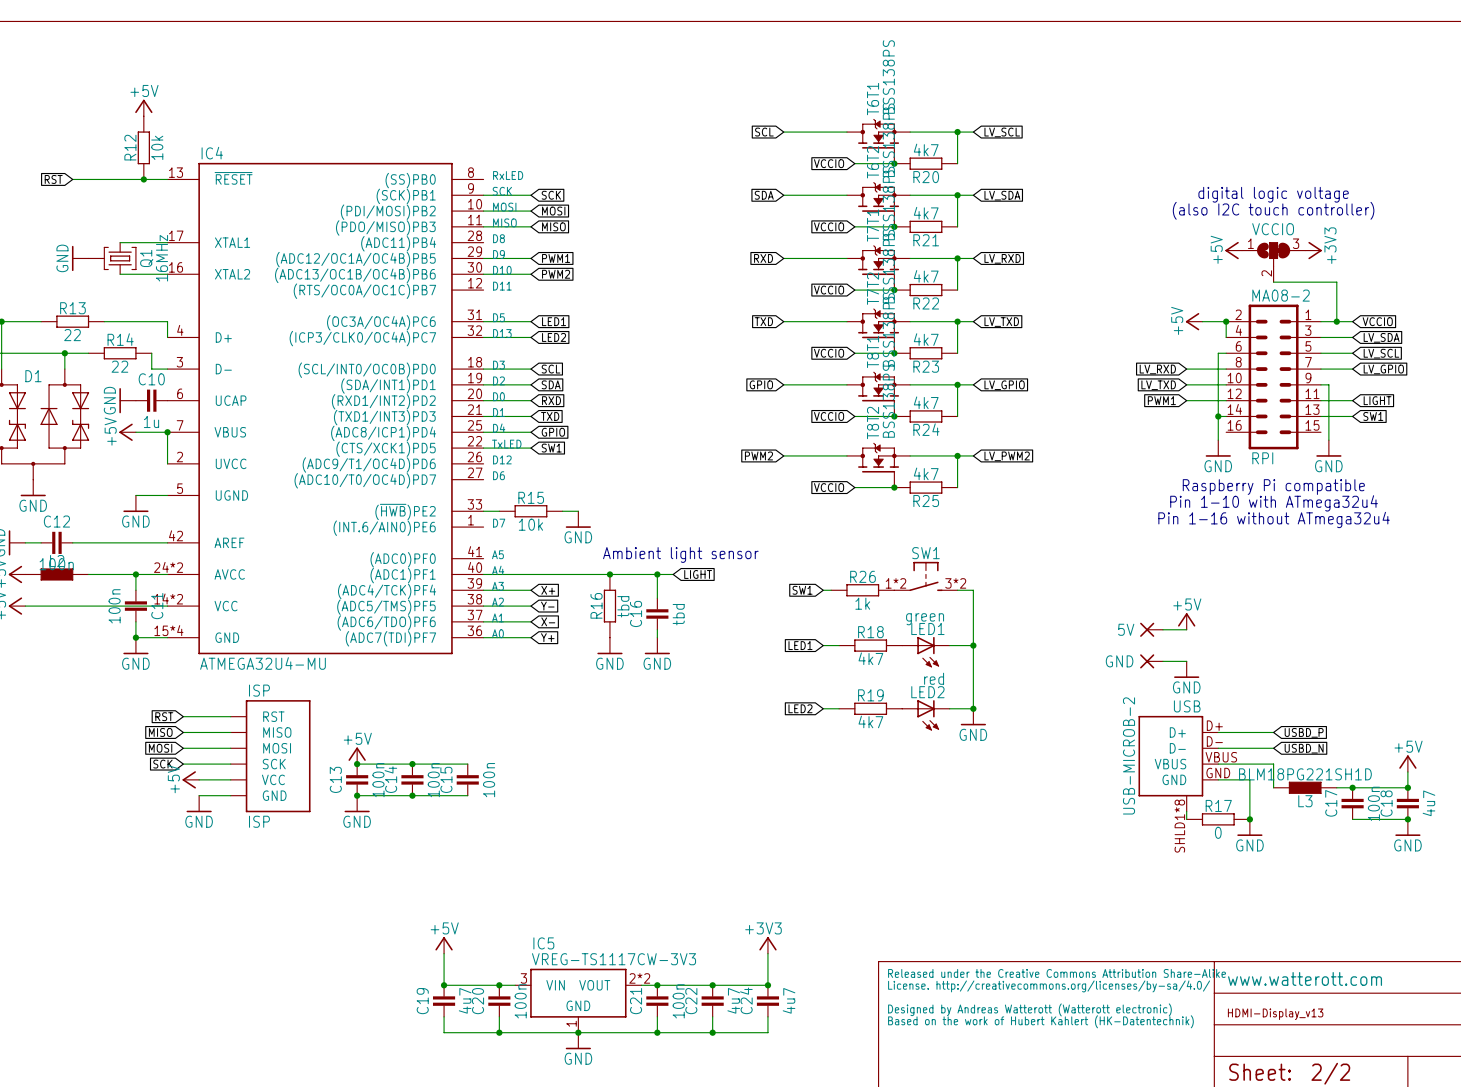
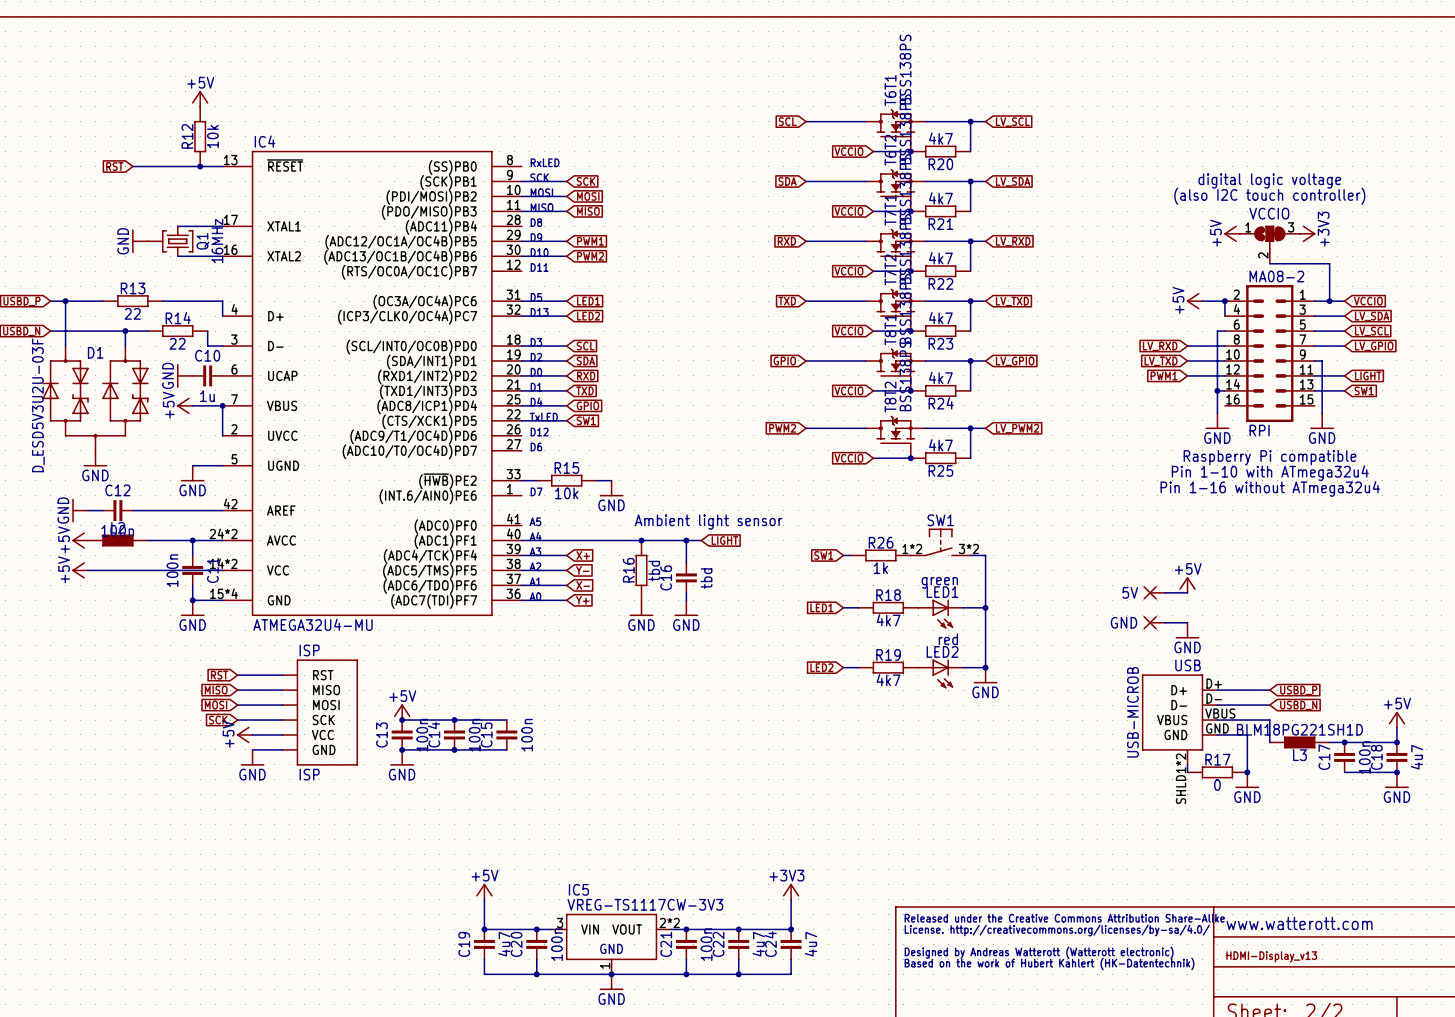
USB value: USB-MICROB-2 (1129, 755) -> USB-MICROB (1132, 712)
USB pin number: SHLD1*8 (1179, 826) -> SHLD1*2 (1181, 778)

